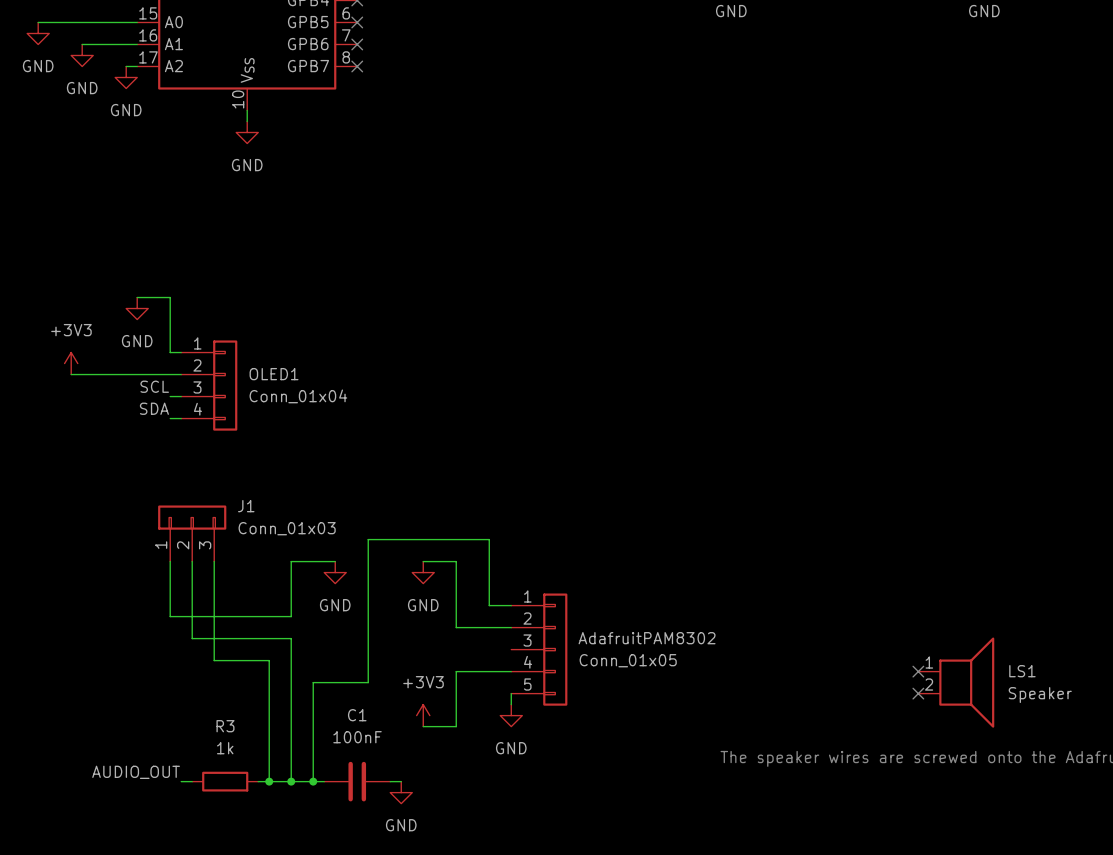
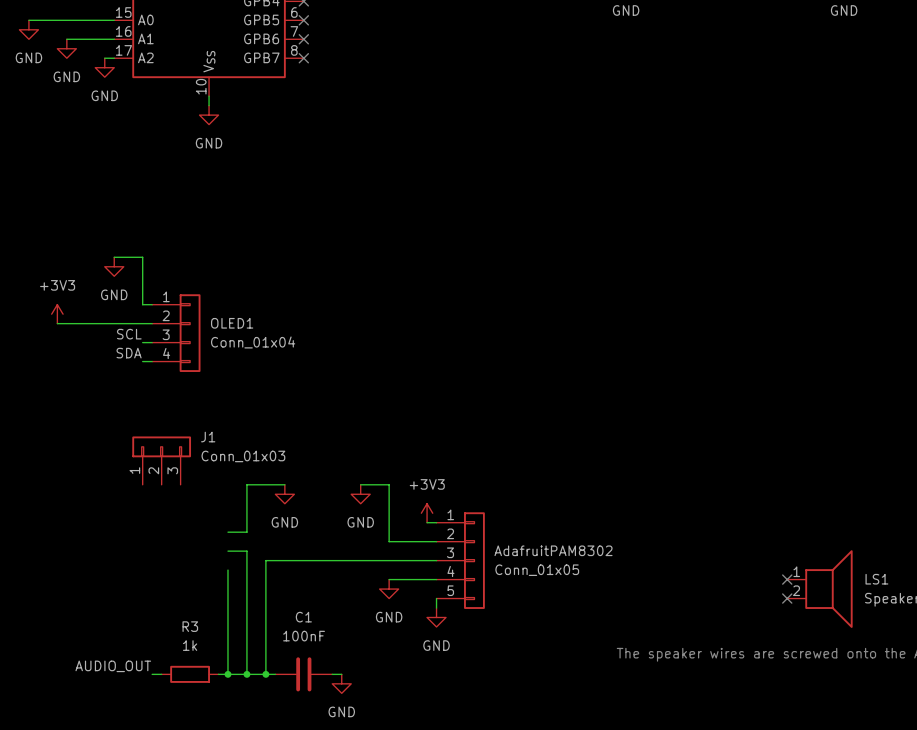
wire: (170, 561) (170, 616) (269, 616) -> none
wire: (192, 561) (192, 638) (269, 638) -> none
wire: (214, 561) (214, 660) (269, 660) -> none
wire: (500, 605) (489, 605) (489, 539) (368, 539) (368, 682) (313, 682) -> (436, 560) (265, 560) (265, 589)
wire: (456, 671) (456, 726) (423, 726) -> none
power symbol: none -> GND (389, 589)
power symbol position: +3V3 (423, 715) -> +3V3 (427, 513)

